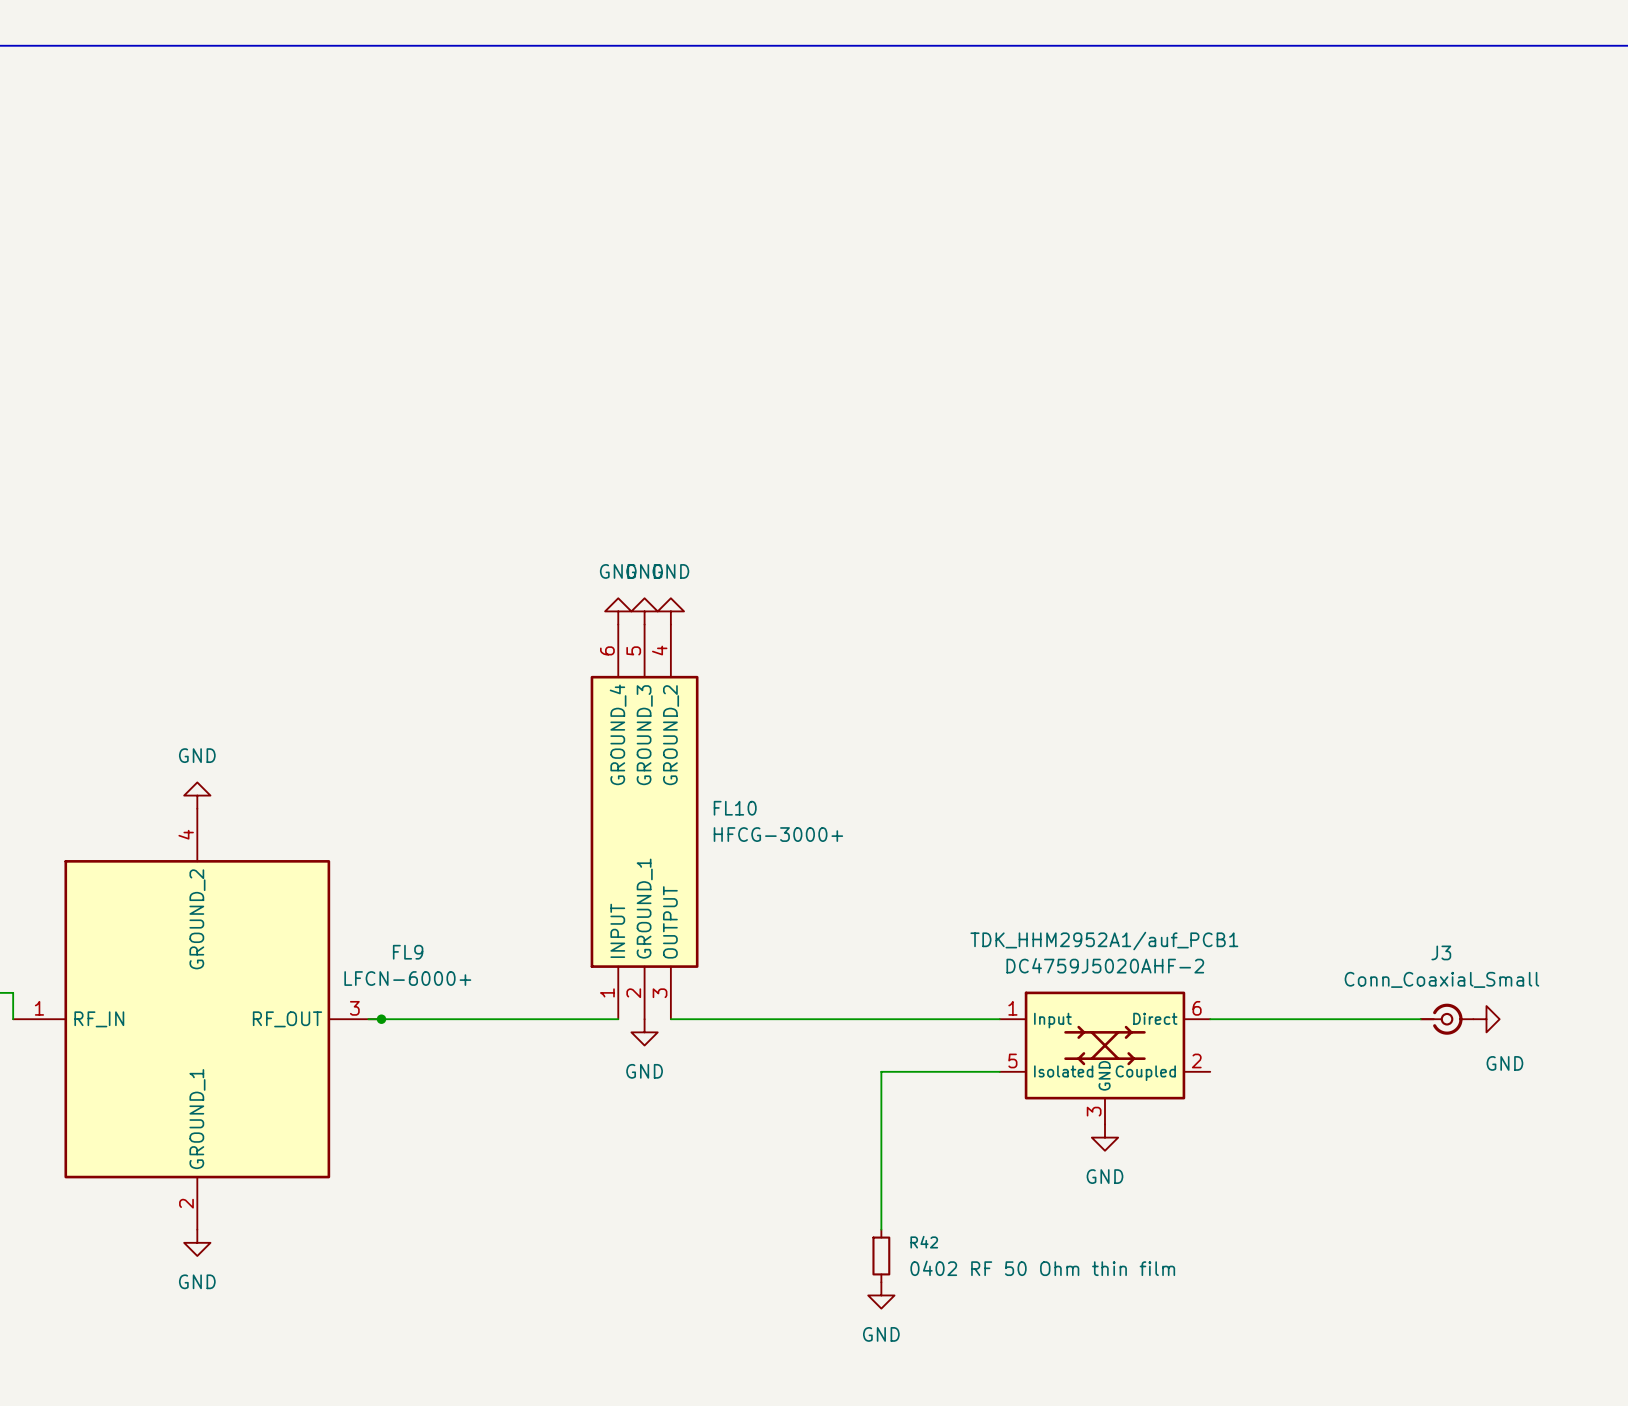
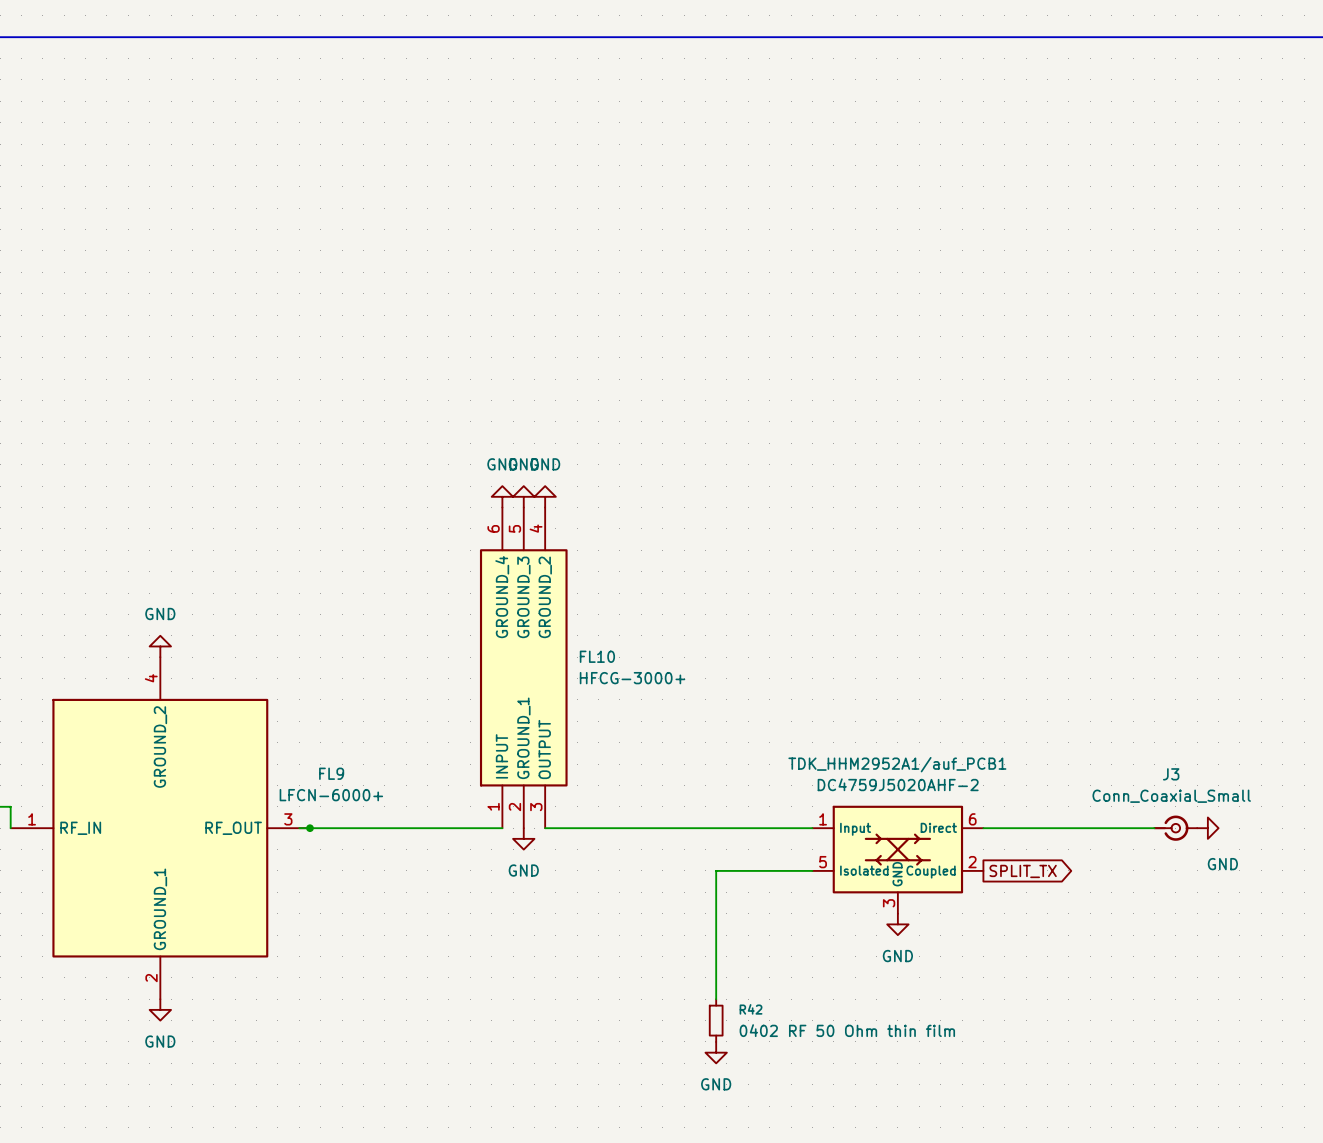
global label: none -> SPLIT_TX (1023, 871)

